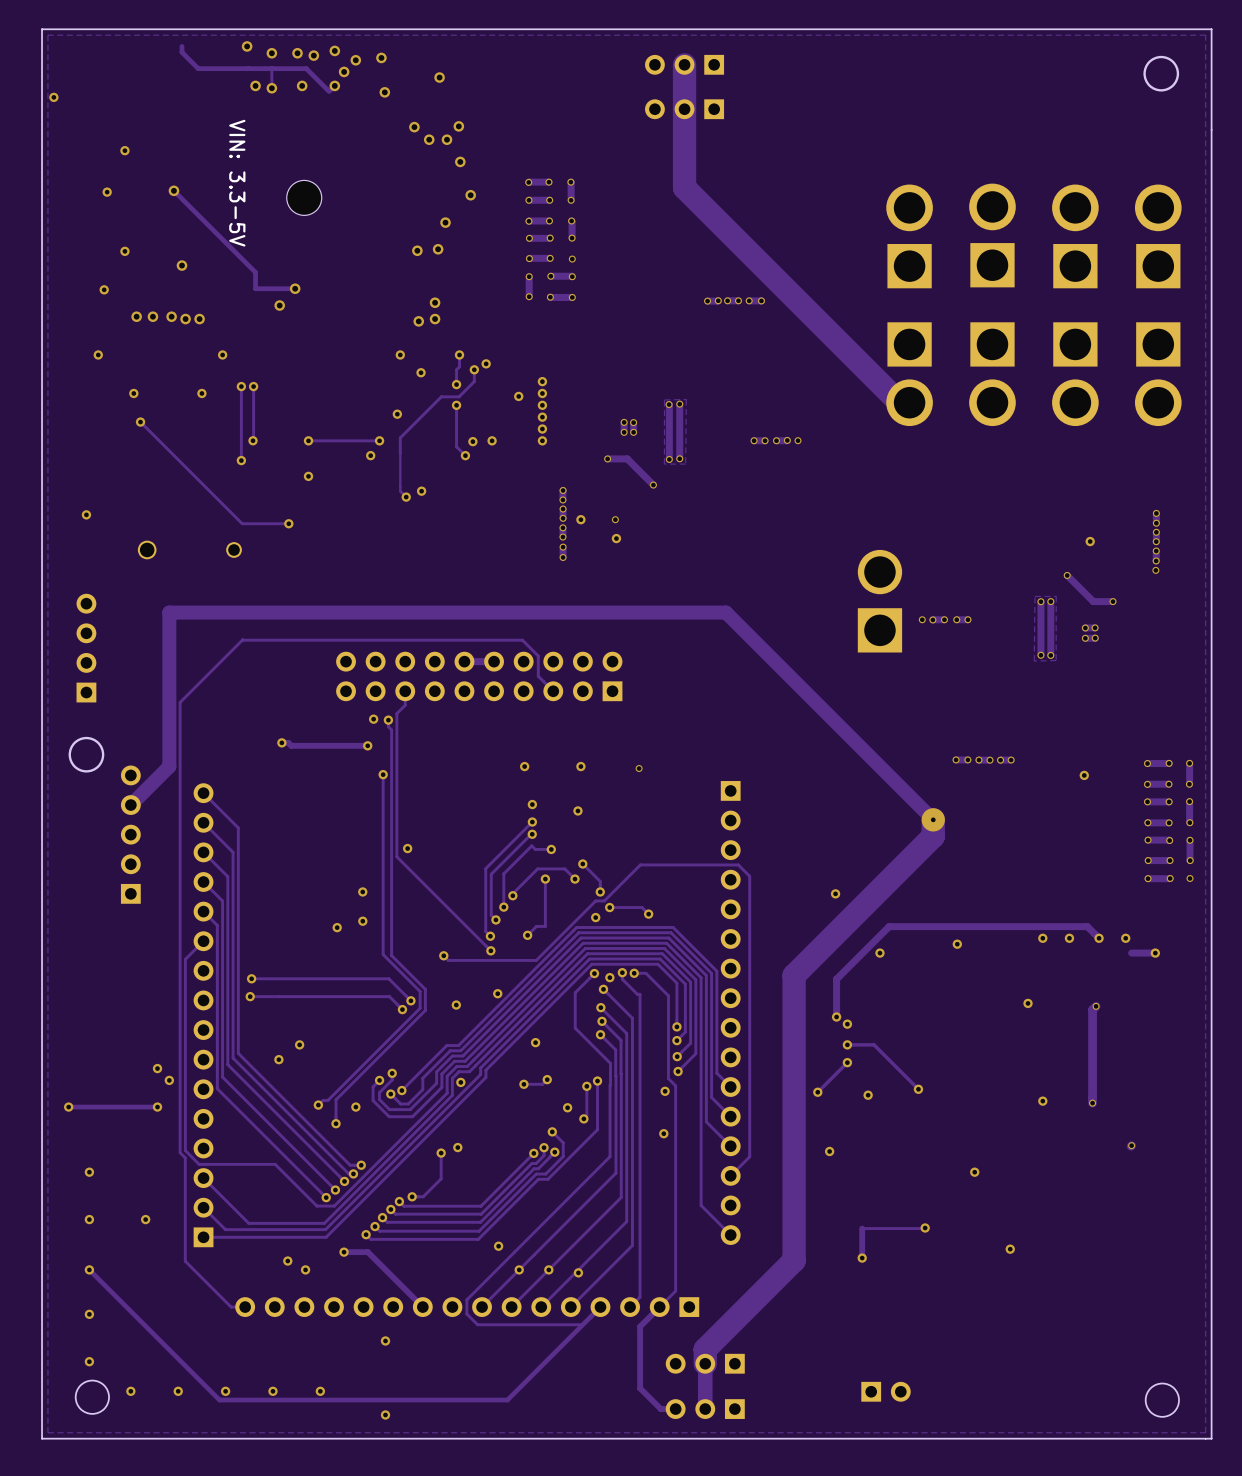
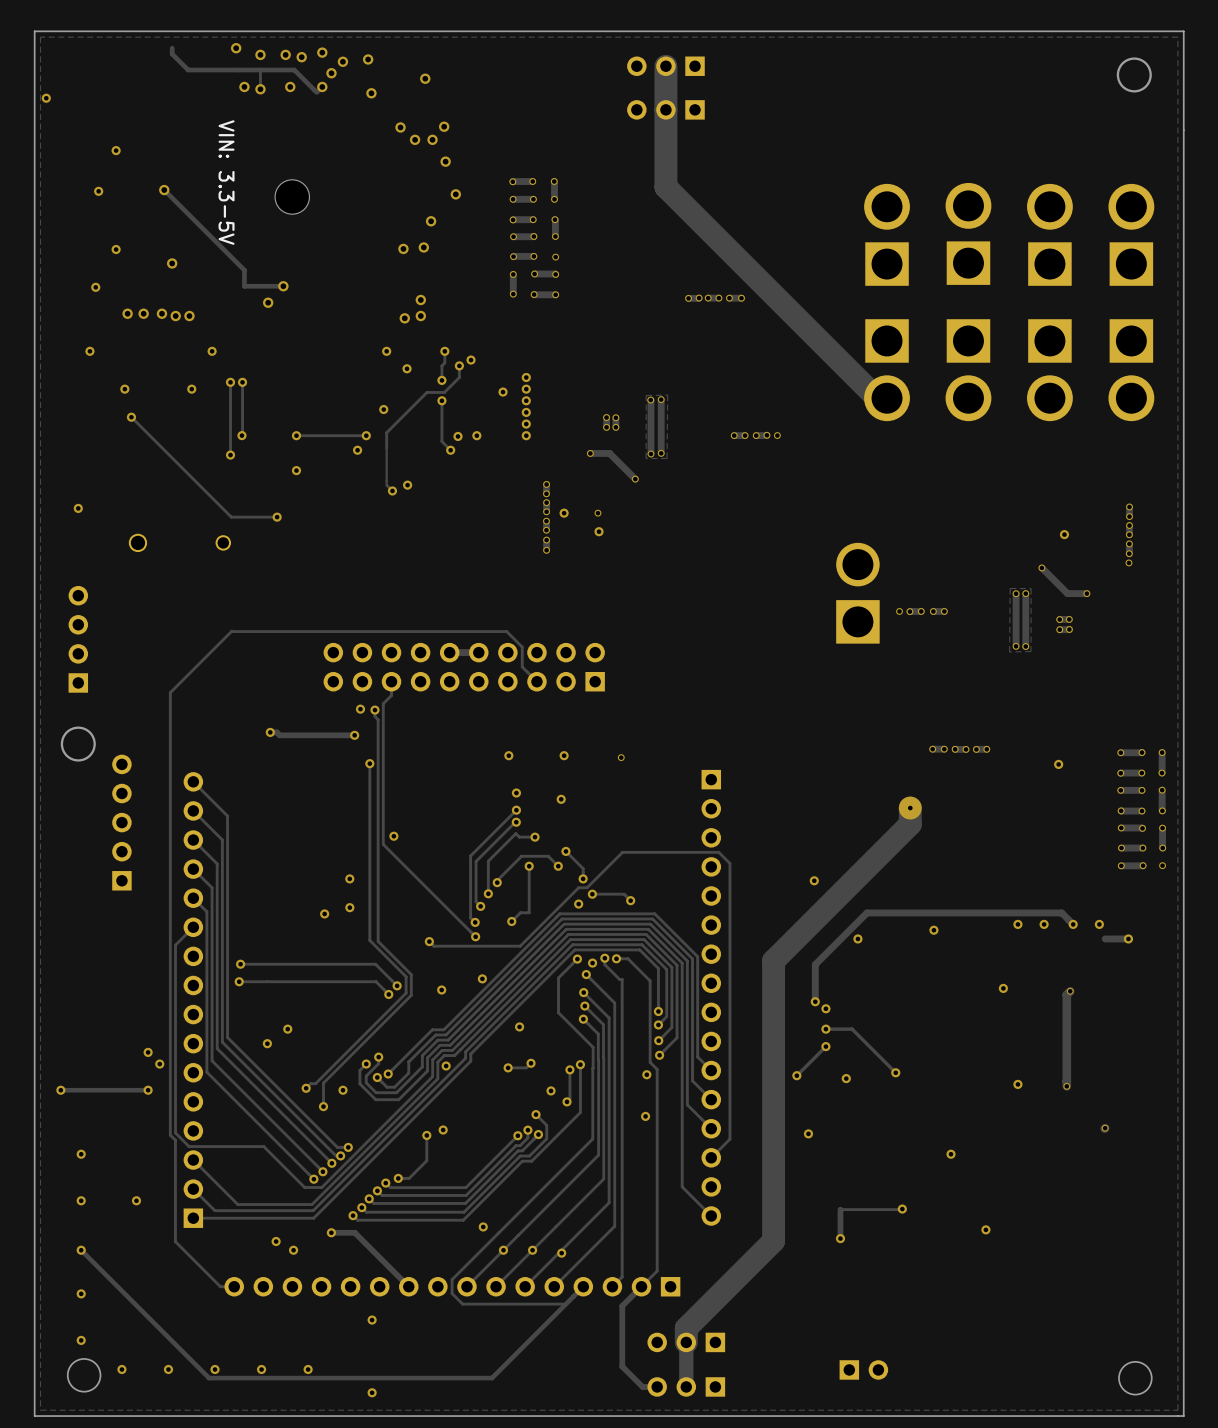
track: (130, 805) (169, 766) (169, 612) (726, 612) (933, 819) -> none

